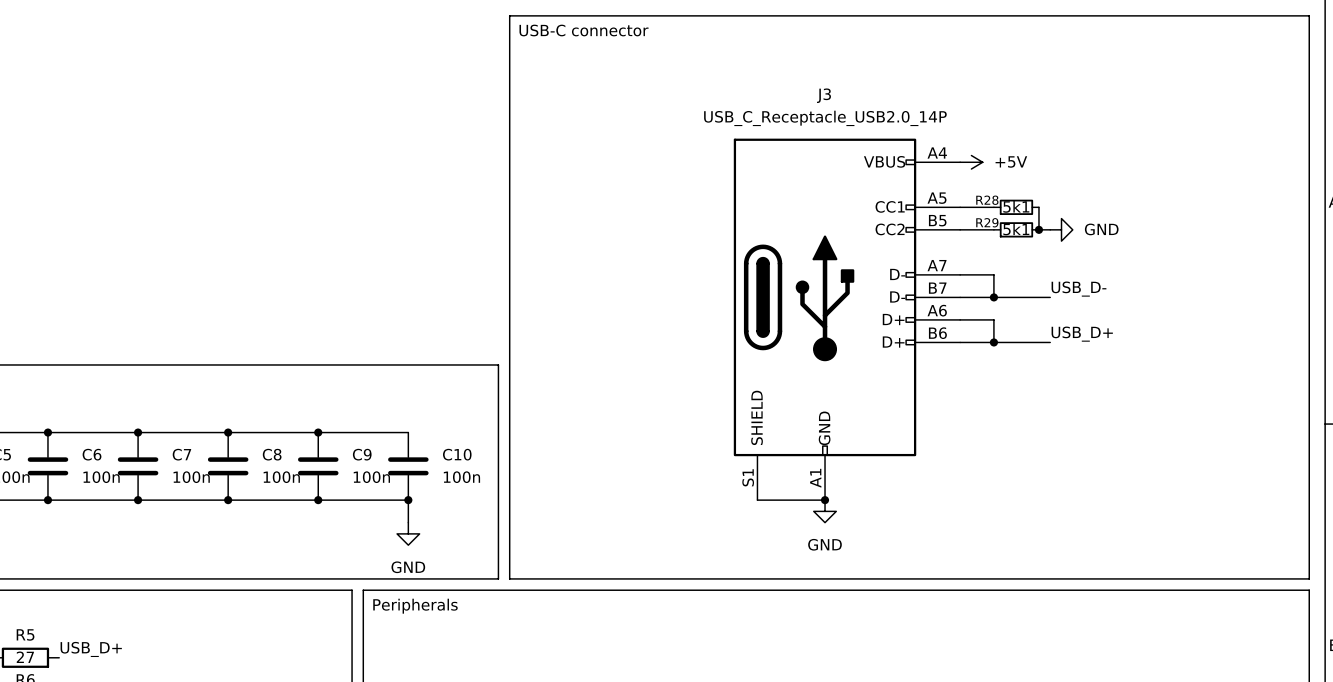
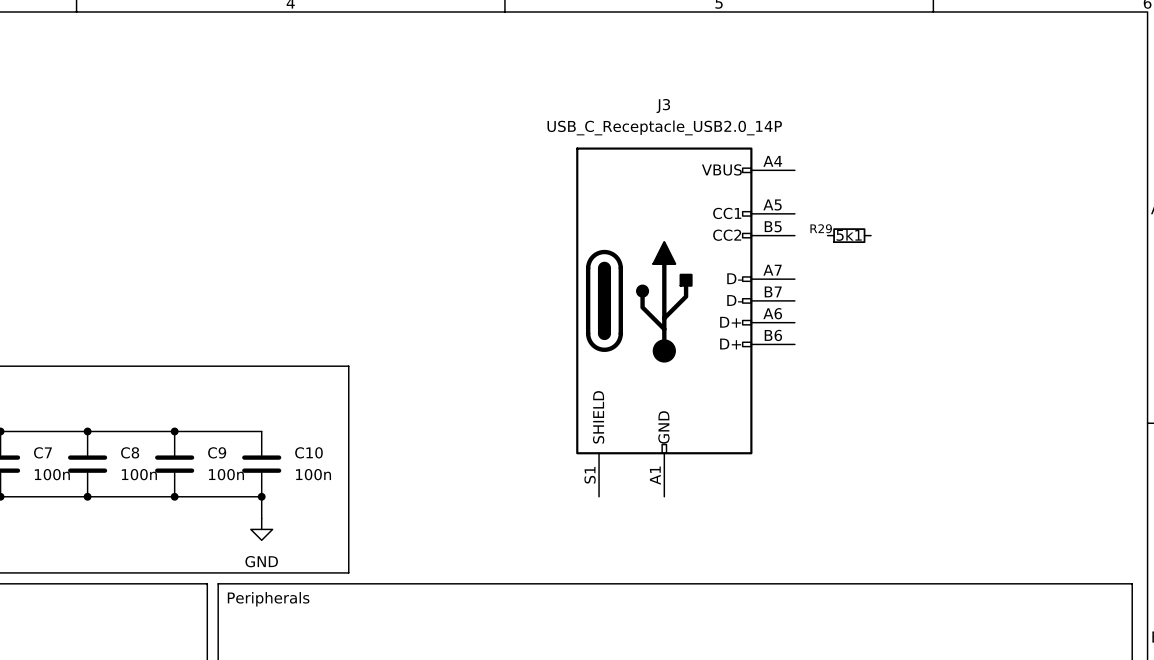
line: (509, 15) (1309, 15) (1309, 578) (509, 578) (509, 15) -> none
text: USB-C connector (583, 30) -> none
power symbol: +5V (971, 162) -> none
wire: (960, 207) (993, 207) -> none
R28: 5k1 (1016, 207) -> none
wire: (1038, 207) (1038, 229) (1050, 229) -> none
wire: (960, 229) (993, 229) -> none
junction: (1038, 229) -> none
power symbol: GND (1061, 229) -> none
wire: (960, 274) (993, 274) (993, 297) -> none
label: USB_D- (1078, 289) -> none
wire: (960, 297) (1050, 297) -> none
junction: (993, 297) -> none
wire: (960, 319) (993, 319) (993, 342) -> none
label: USB_D+ (1082, 334) -> none
wire: (960, 342) (1050, 342) -> none
junction: (993, 342) -> none
wire: (757, 500) (825, 500) -> none
junction: (825, 500) -> none
power symbol: GND (825, 511) -> none

